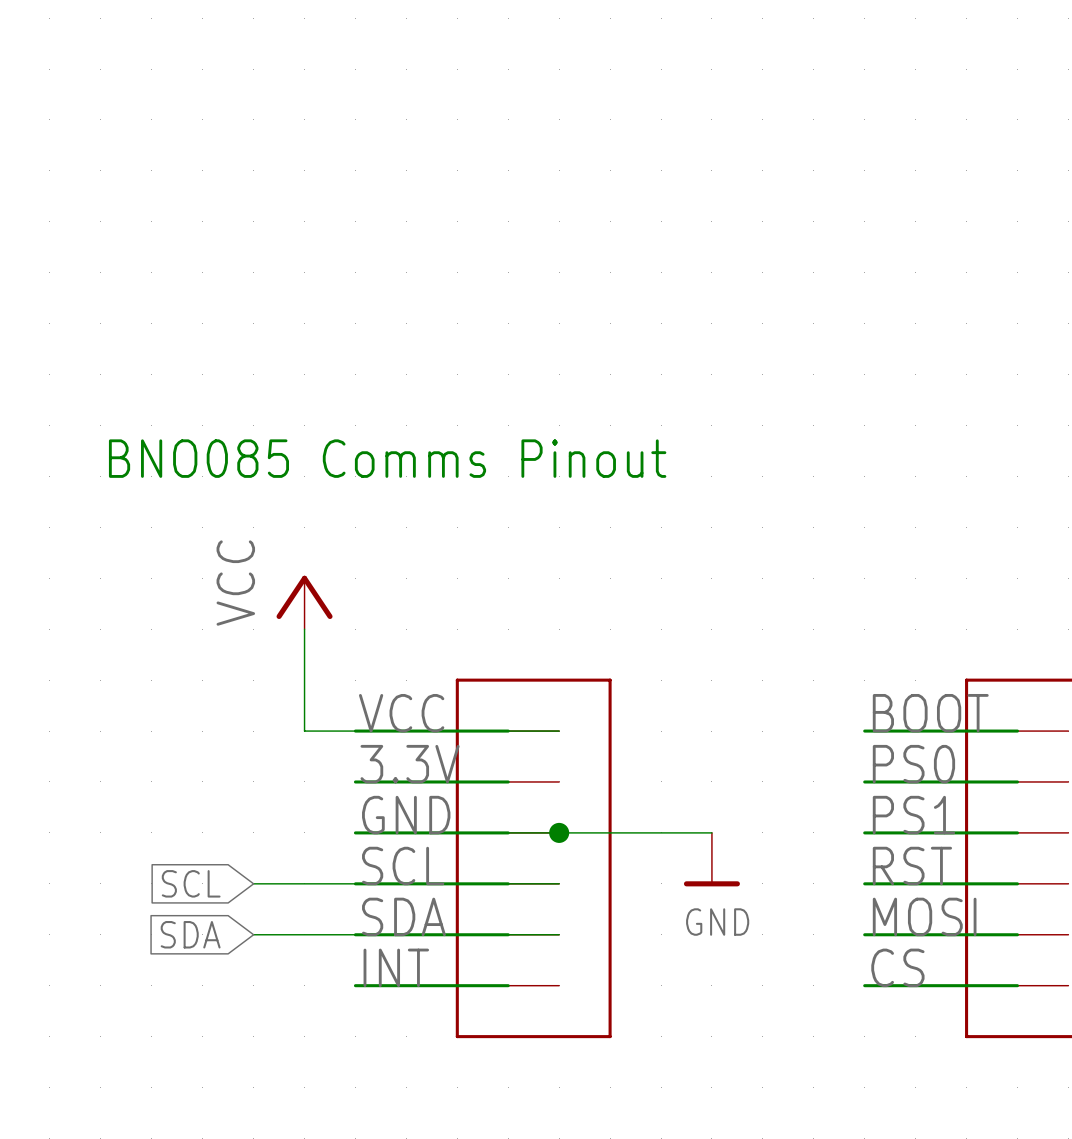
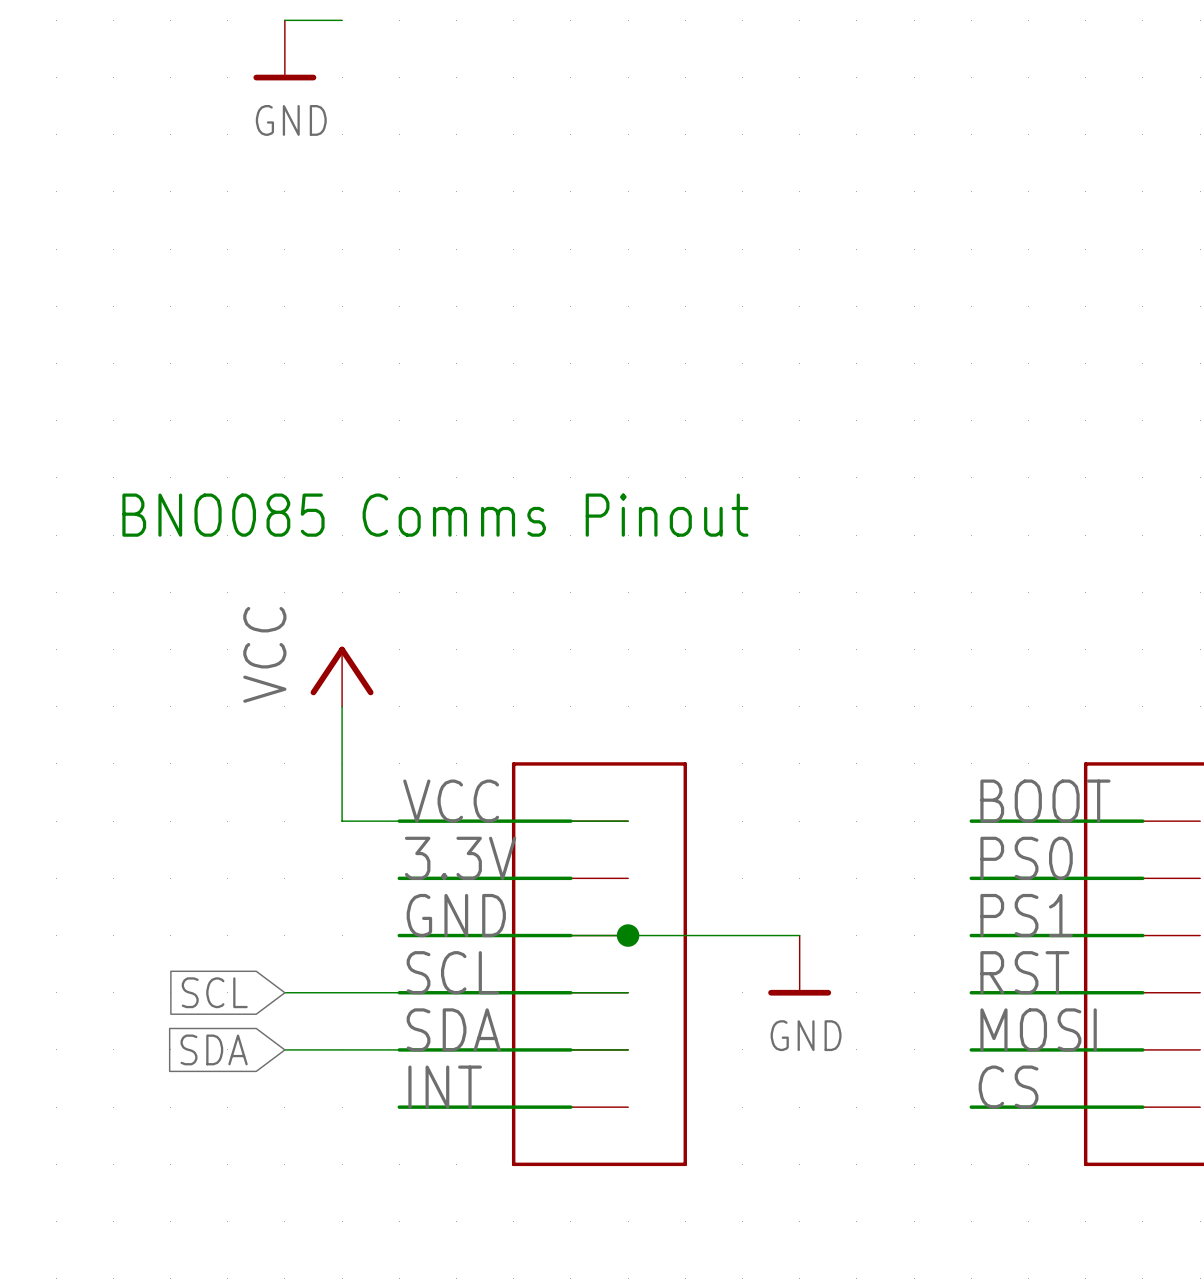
wire: none -> (284, 20) (342, 20)
power symbol: none -> GND (284, 50)

